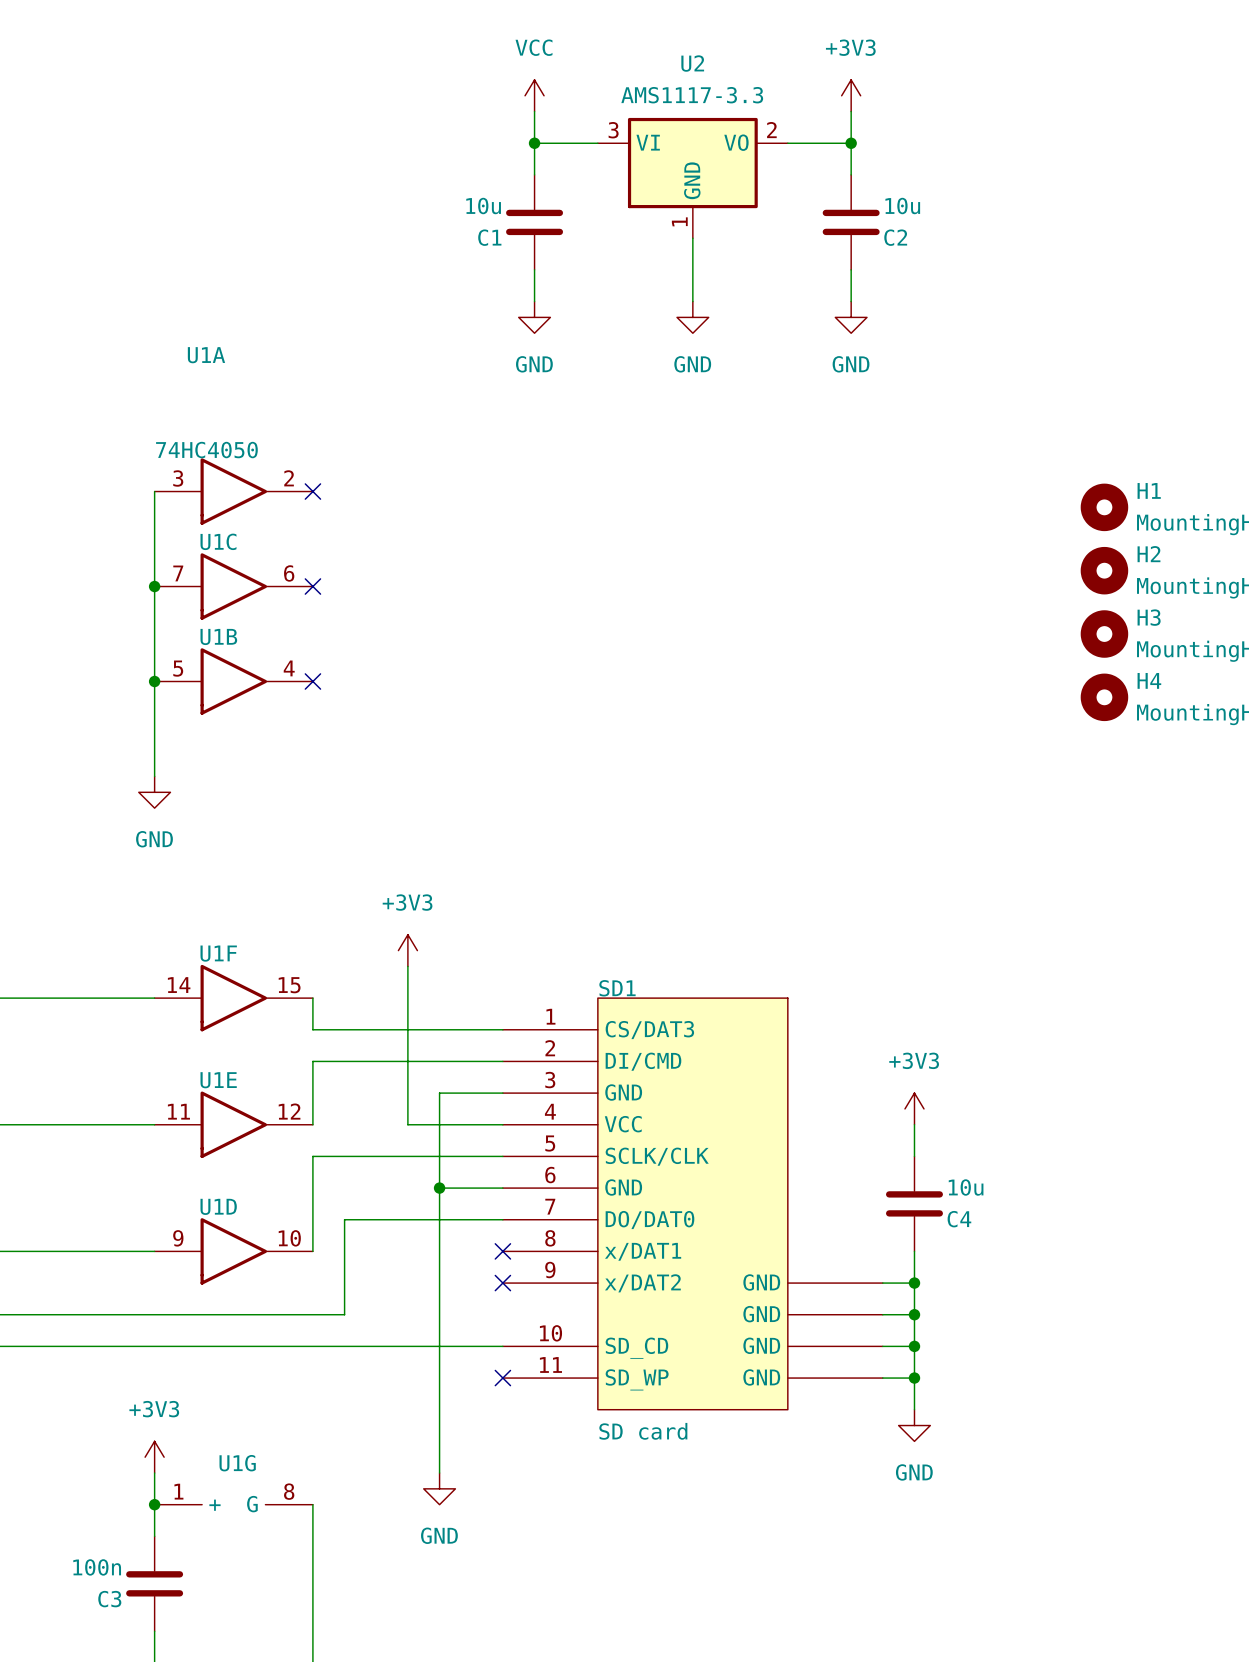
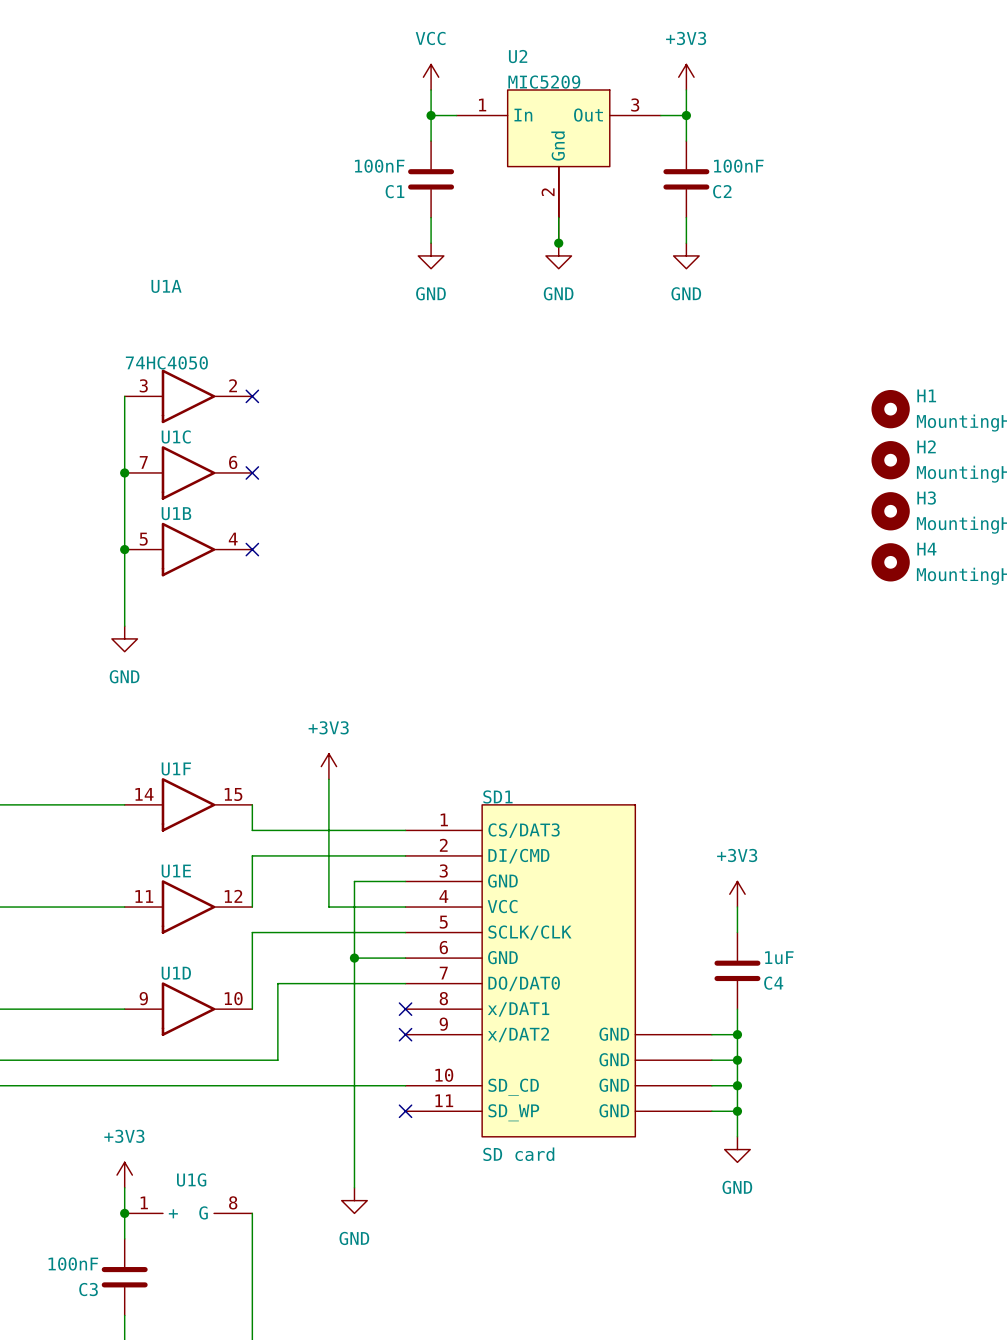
U2 name position: U2 (692, 63) -> U2 (518, 56)
U2 value: AMS1117-3.3 (692, 95) -> MIC5209 (544, 82)
U2 symbol: [597, 117, 788, 239] -> [456, 90, 661, 244]
C1 value: 10u (483, 206) -> 100nF (379, 166)
C2 value: 10u (902, 206) -> 100nF (738, 166)
junction: none -> (558, 243)
C4 value: 10u (966, 1187) -> 1uF (779, 957)
C3 value: 100n (97, 1567) -> 100nF (73, 1263)

